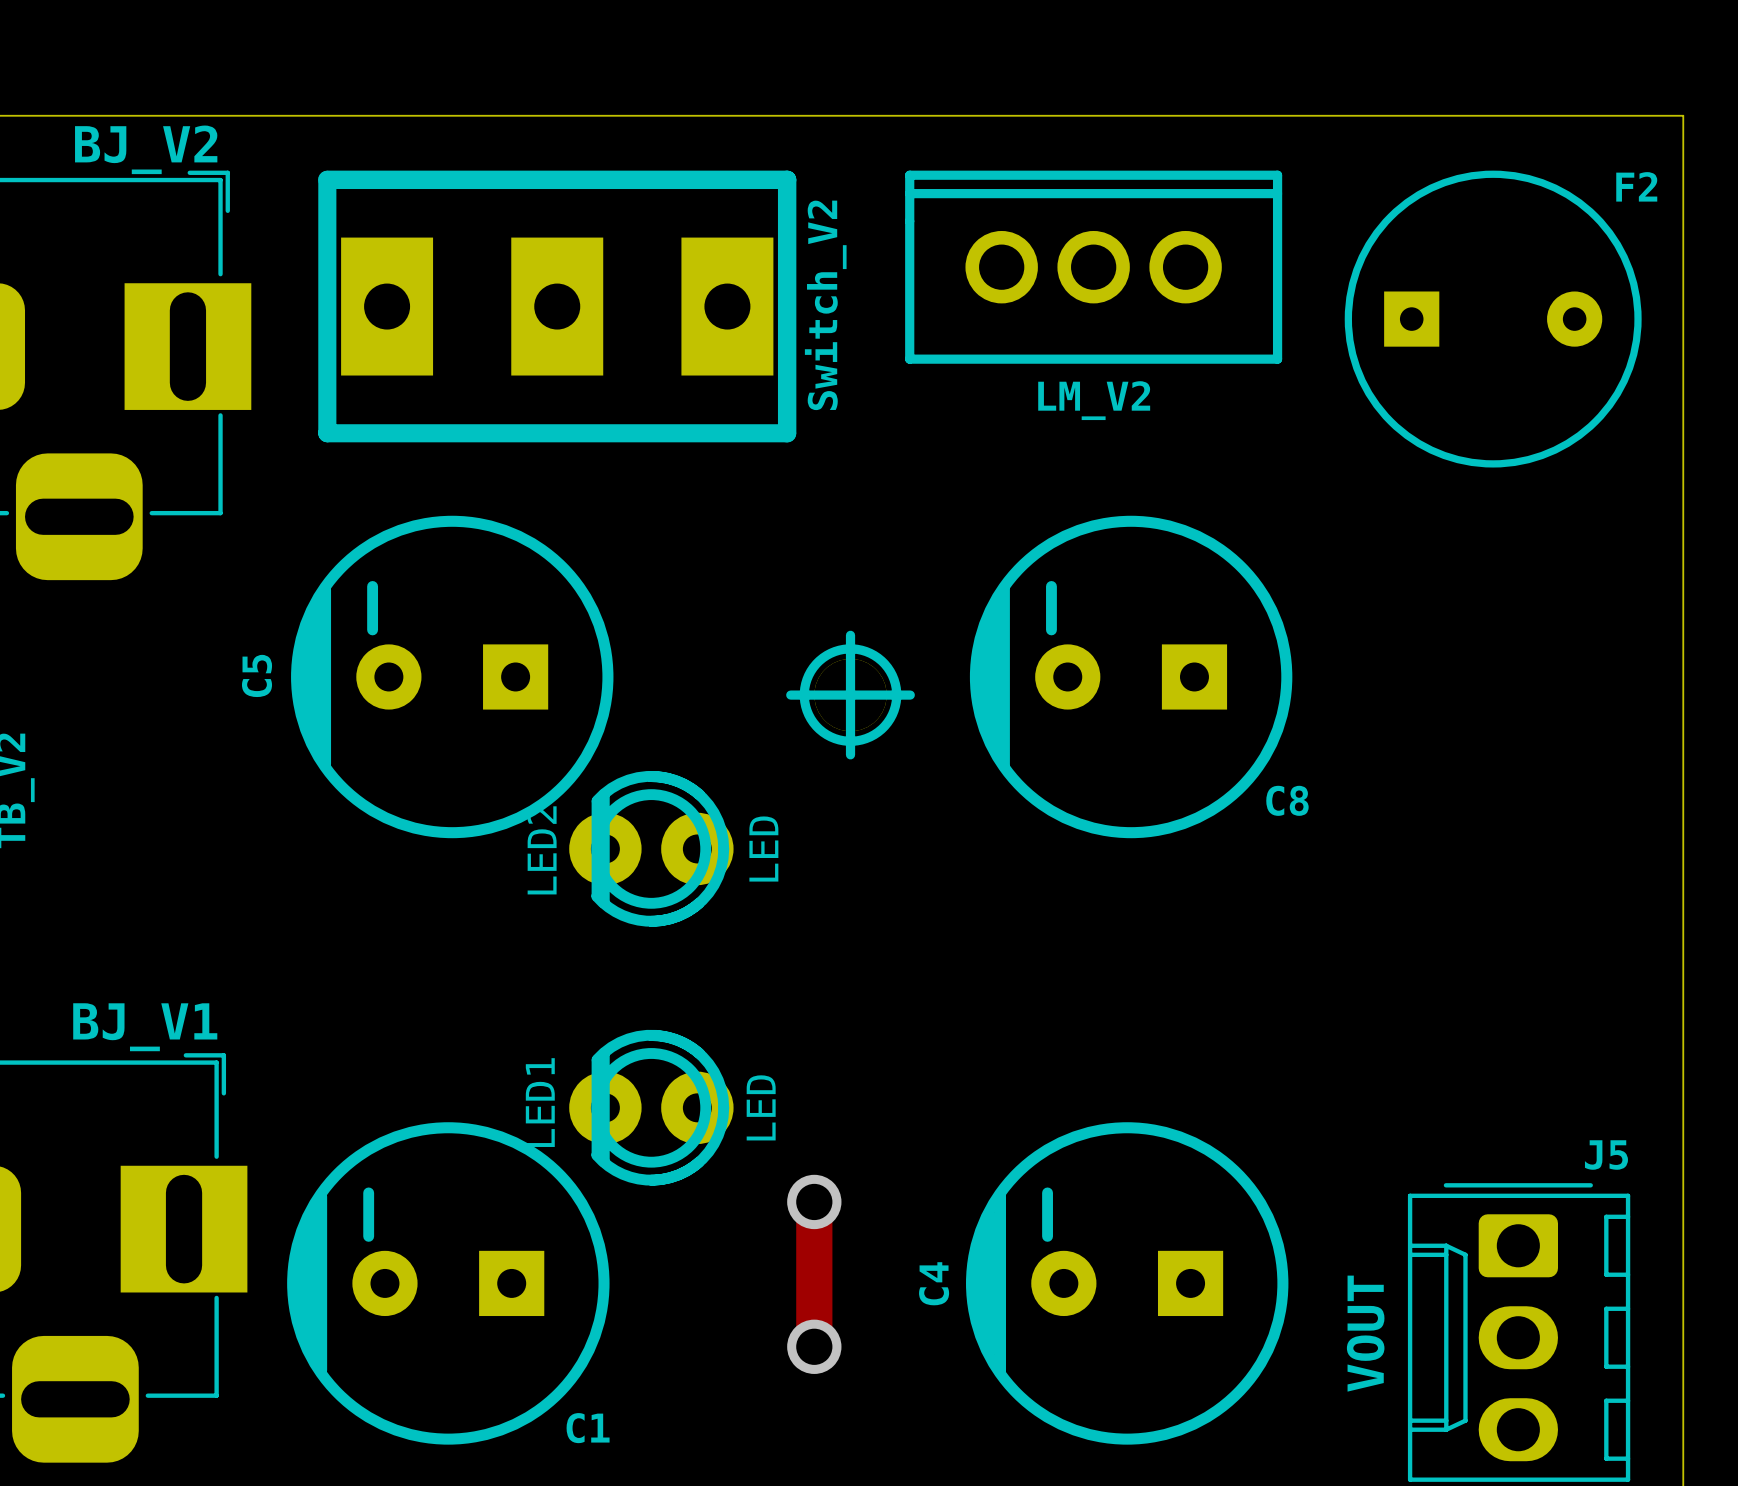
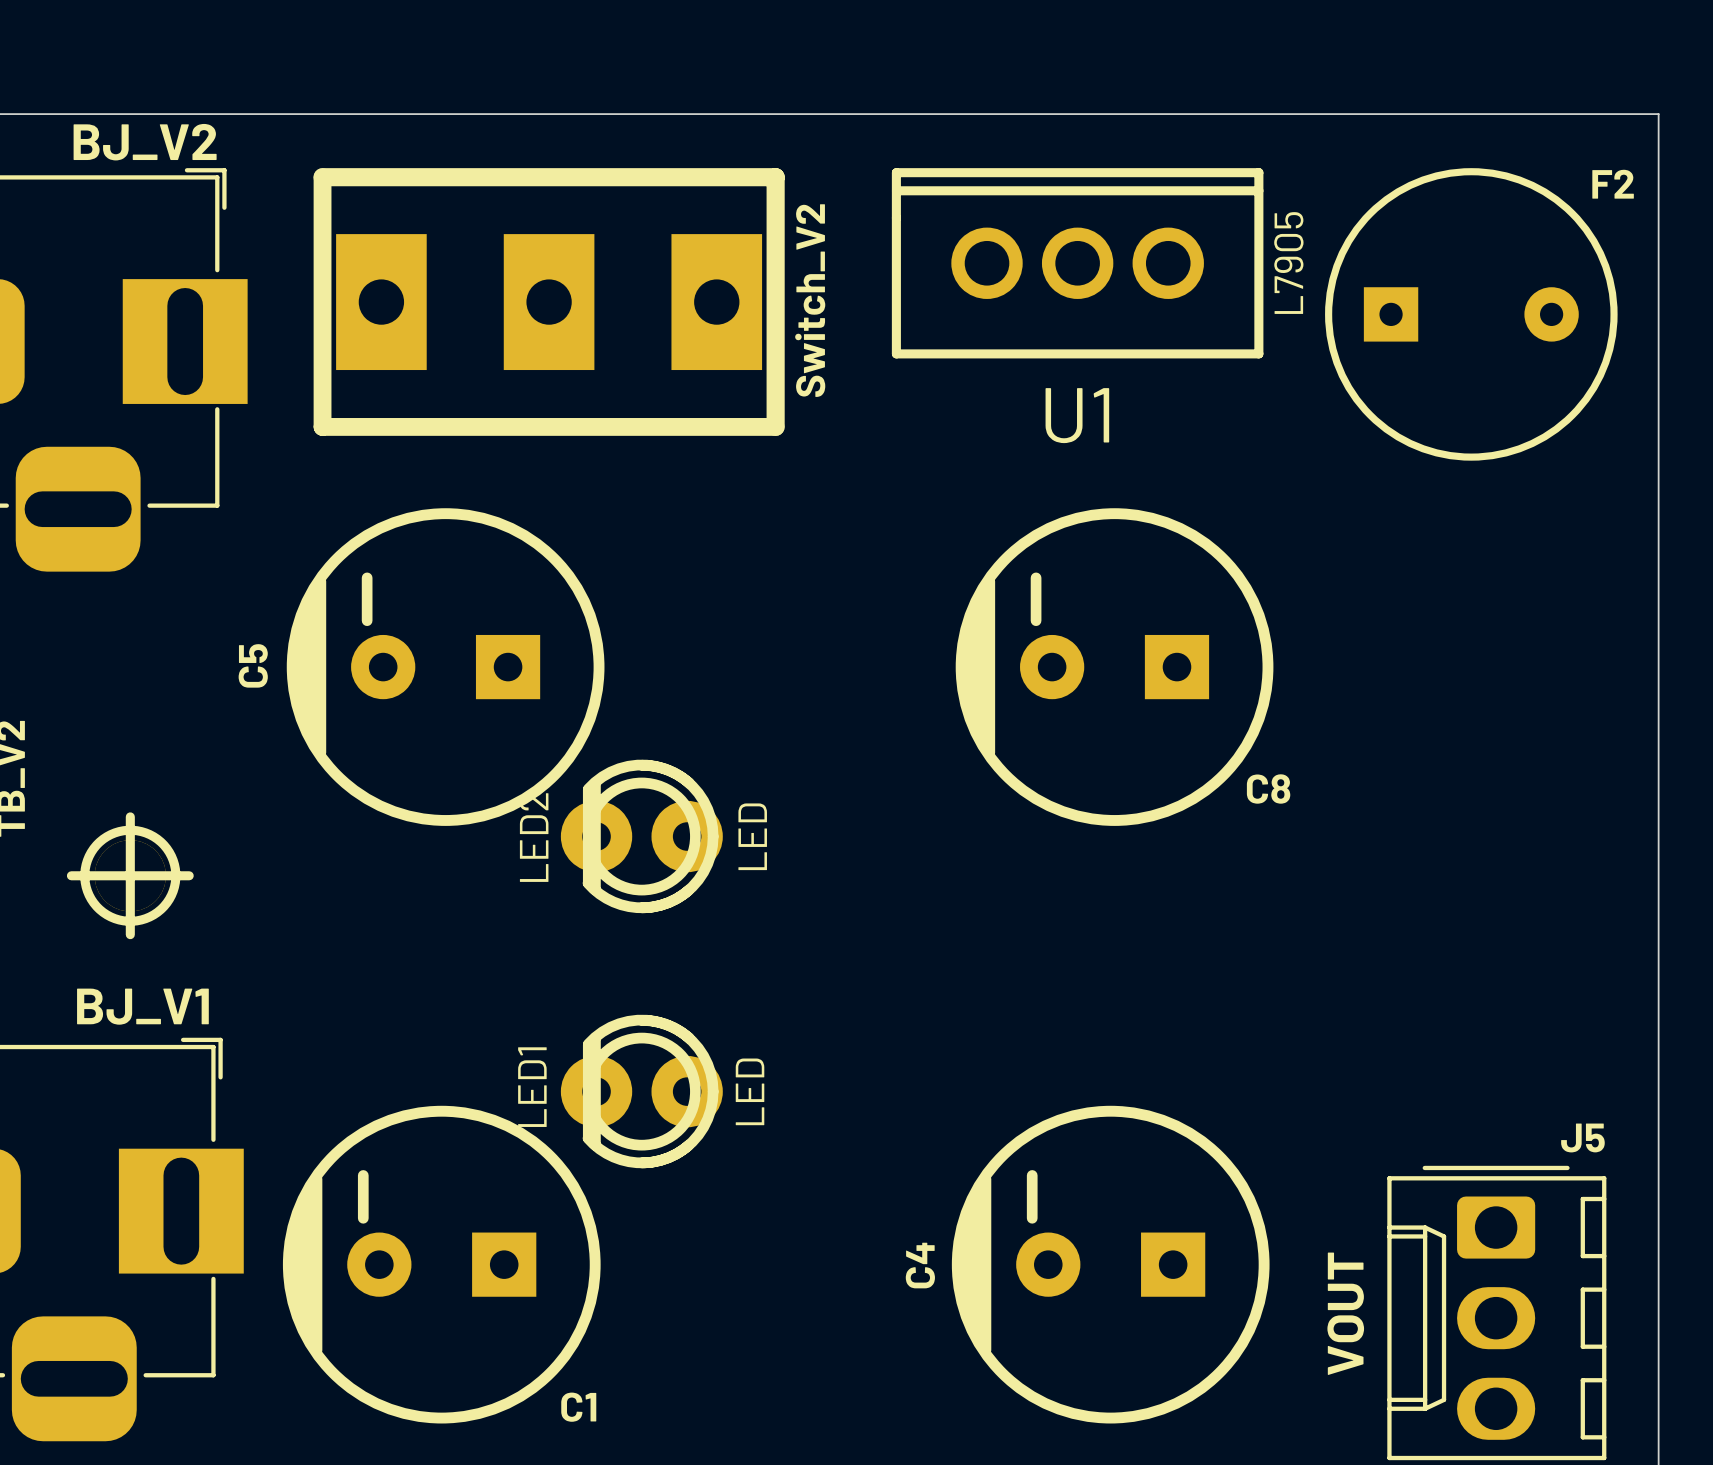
LM_V2 value: none -> L7905 (1288, 263)
LM_V2 name: LM_V2 (1094, 400) -> U1 (1077, 415)
part position: (850, 695) -> (130, 875)
track: (814, 1201) (814, 1346) -> none
via: (814, 1201) -> none
via: (814, 1346) -> none

